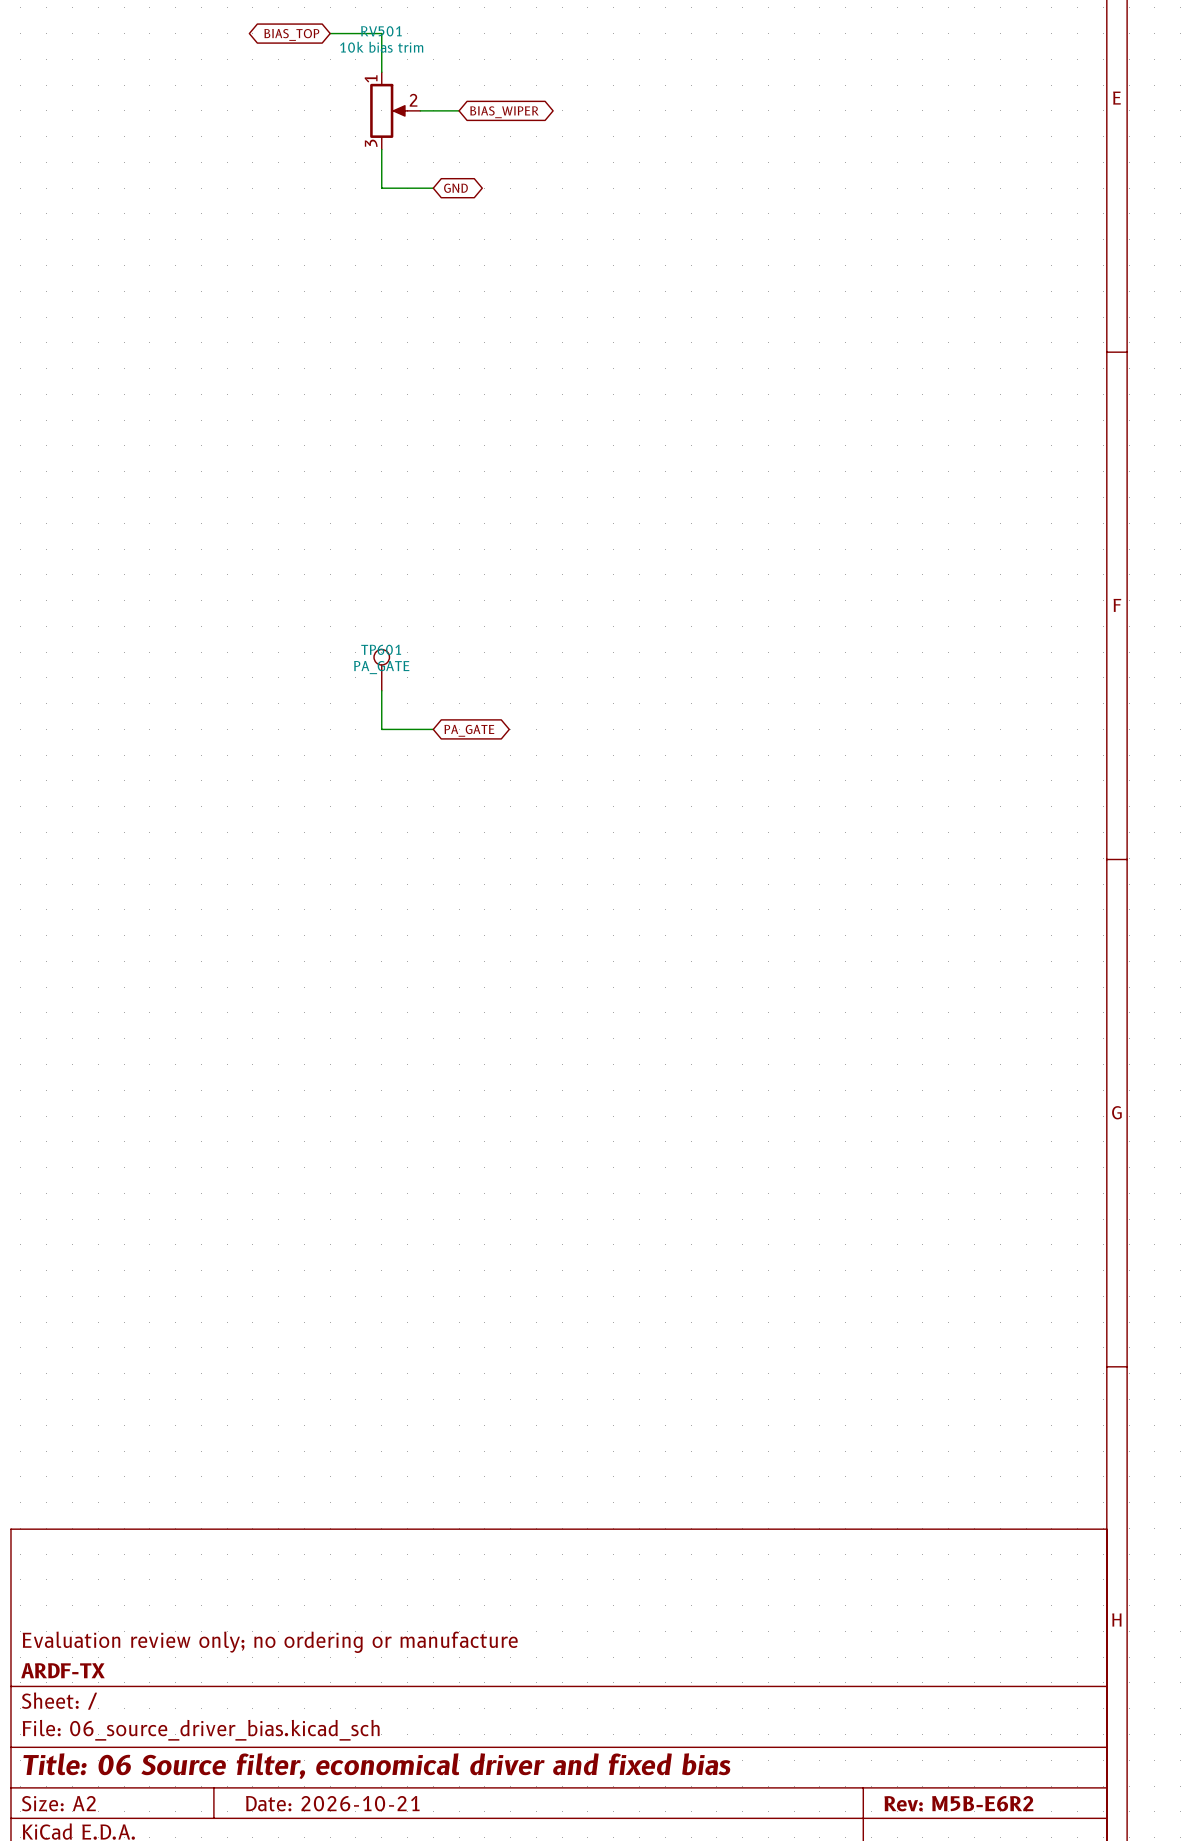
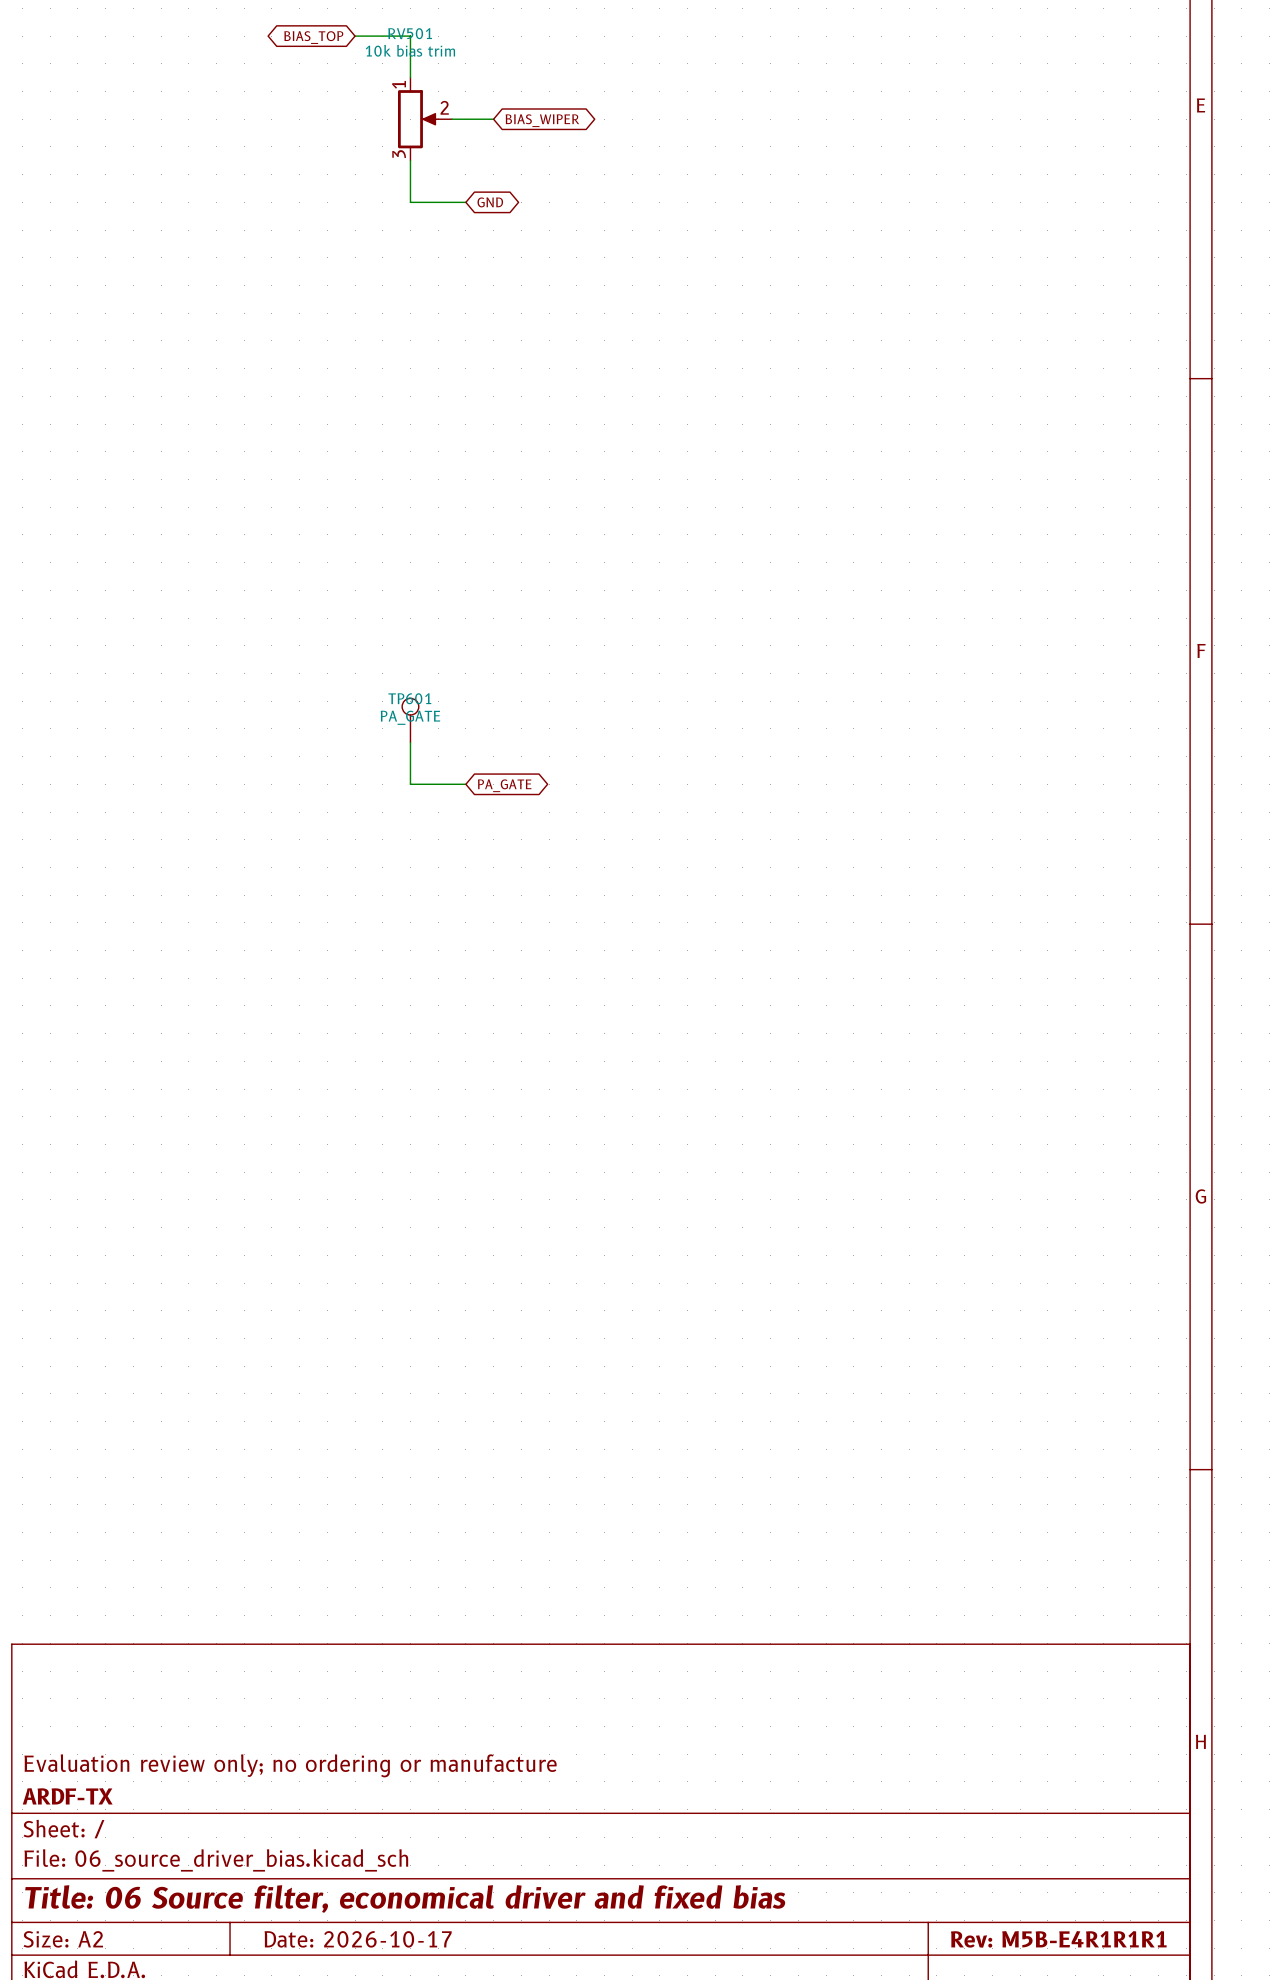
title block: Date: 2026-10-21 (332, 1803) -> Date: 2026-10-17 (358, 1939)
title block: Rev: M5B-E6R2 (958, 1803) -> Rev: M5B-E4R1R1R1 (1058, 1939)

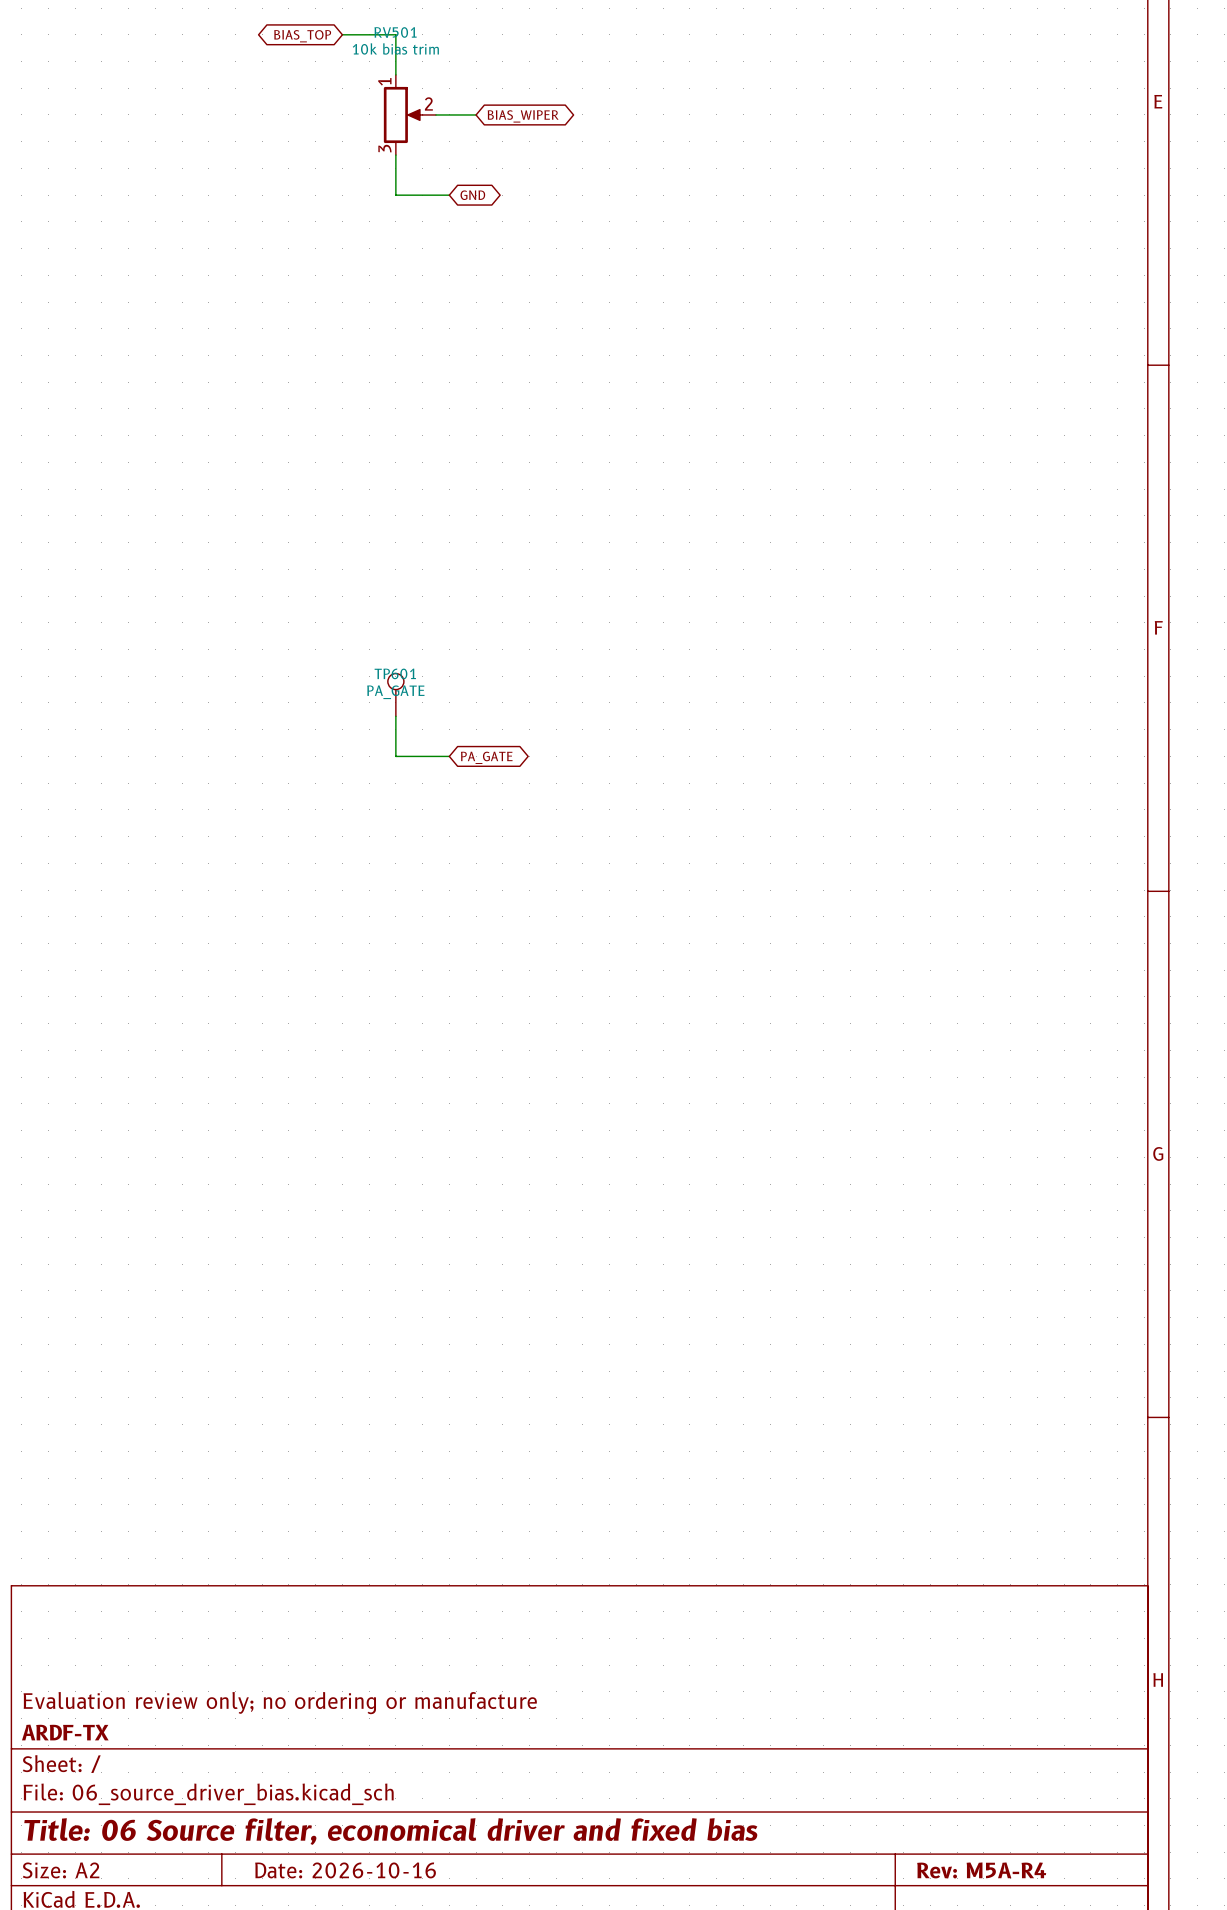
title block: Date: 2026-10-17 (358, 1939) -> Date: 2026-10-16 (345, 1870)
title block: Rev: M5B-E4R1R1R1 (1058, 1939) -> Rev: M5A-R4 (981, 1870)

